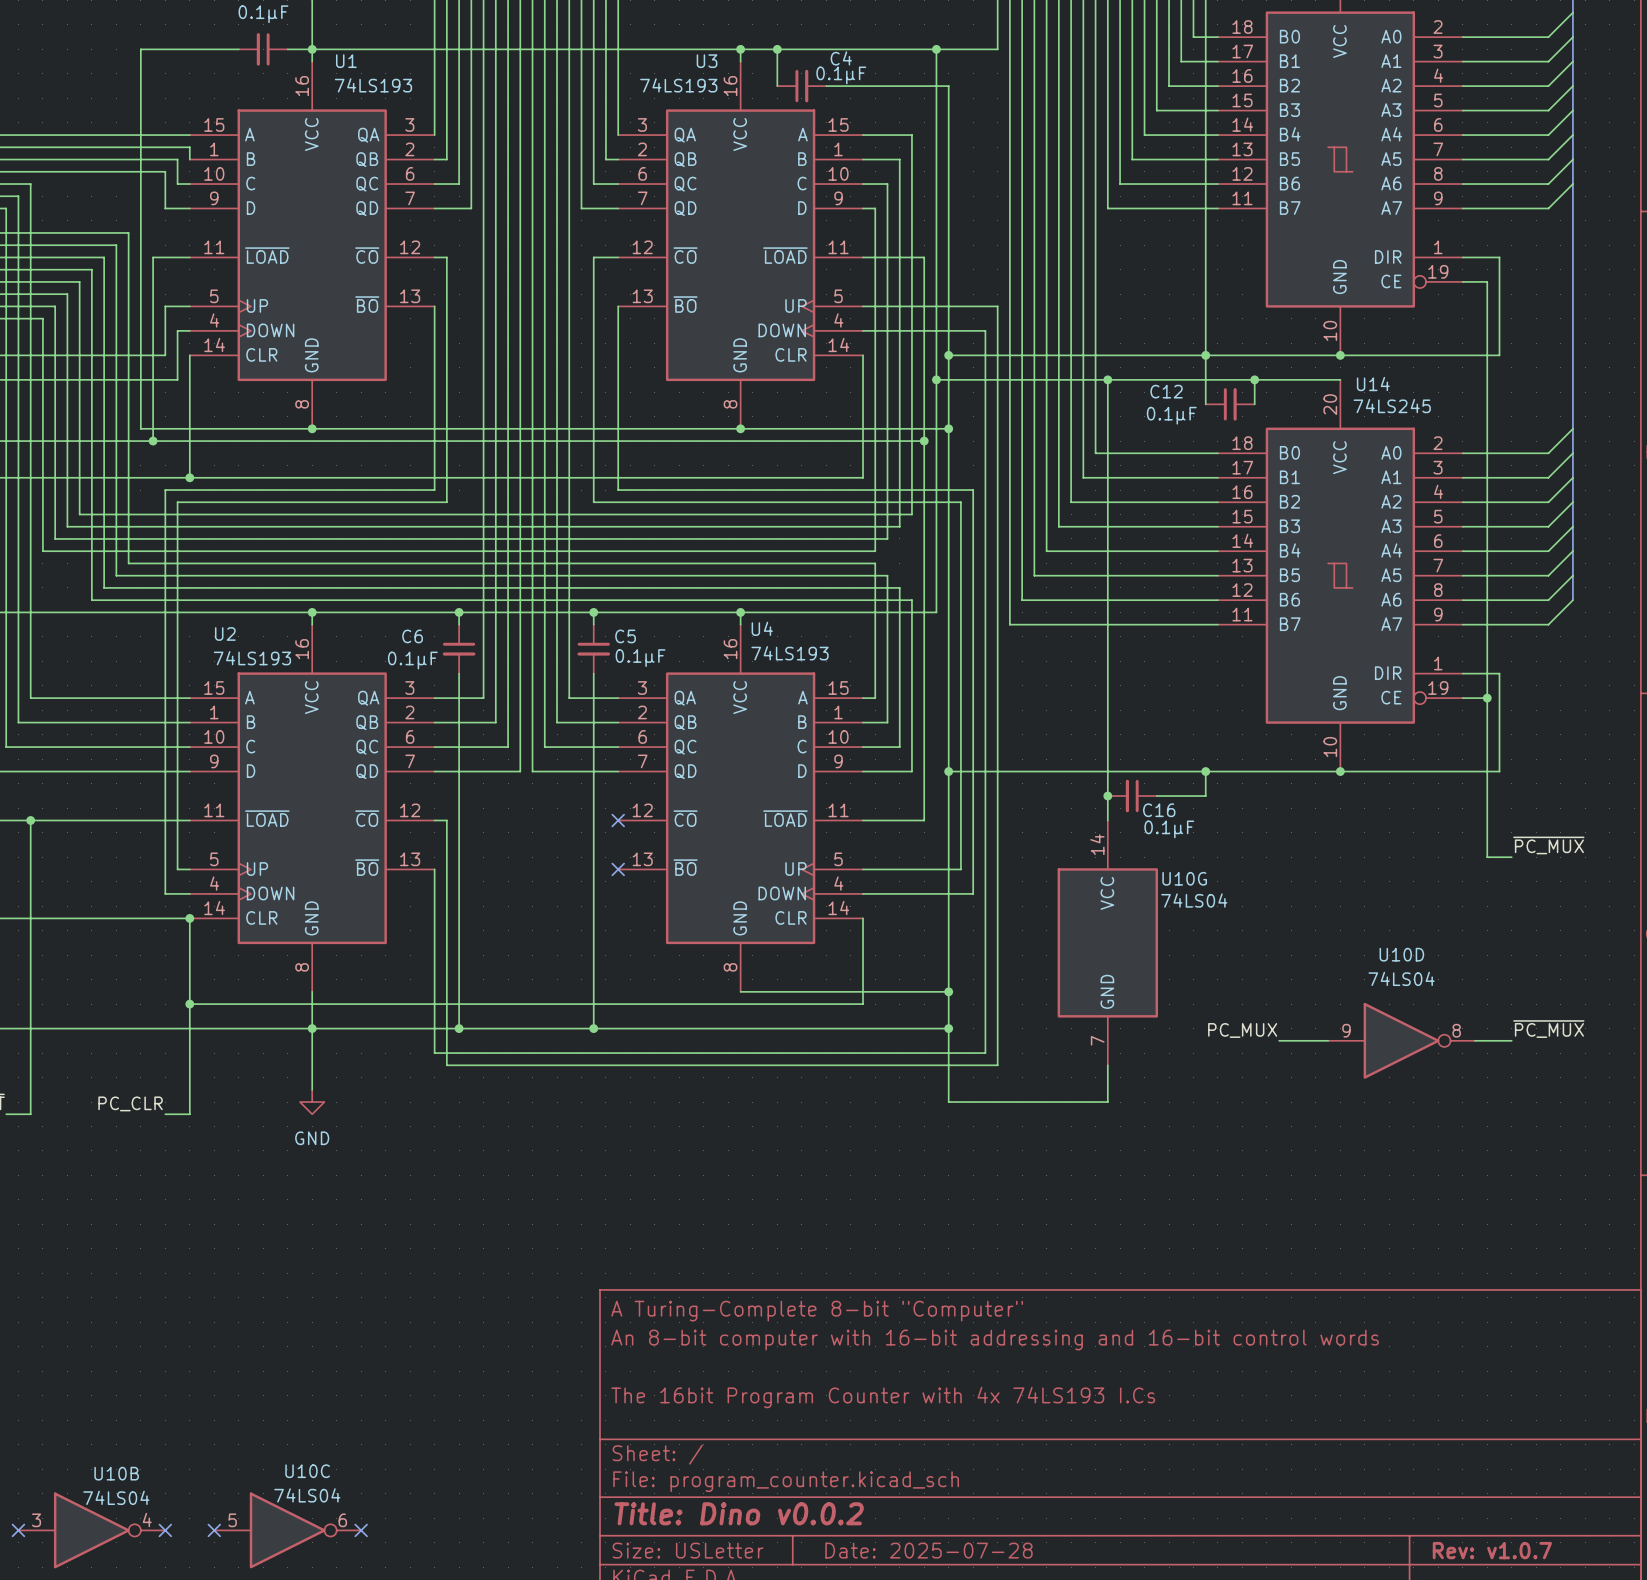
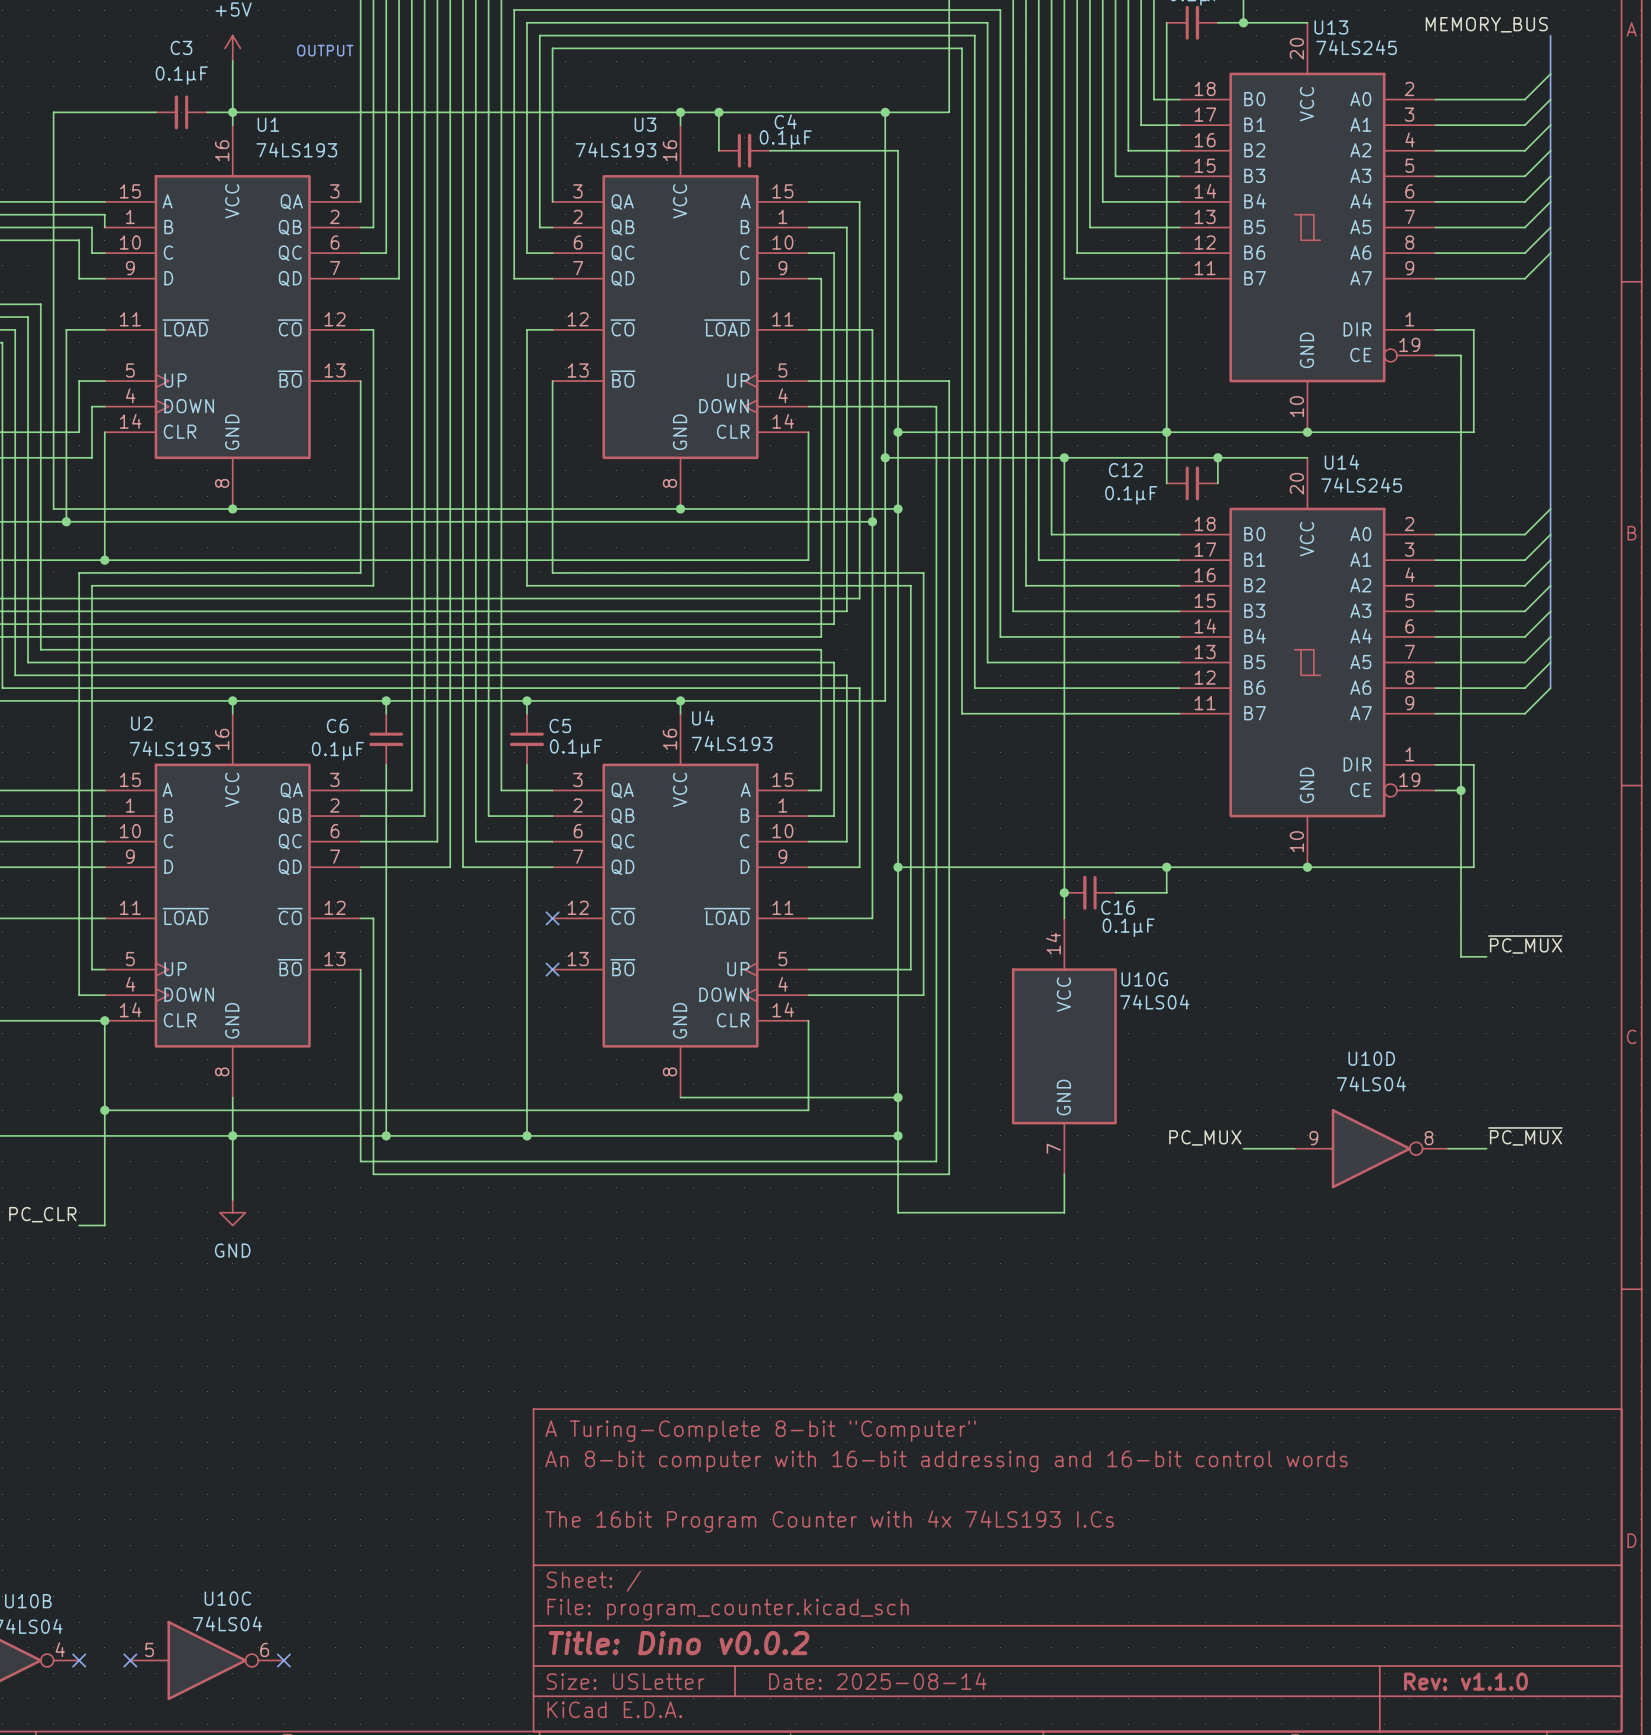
title block: Date: 2025-07-28 (928, 1550) -> Date: 2025-08-14 (877, 1681)
title block: Rev: v1.0.7 (1492, 1550) -> Rev: v1.1.0 (1465, 1681)

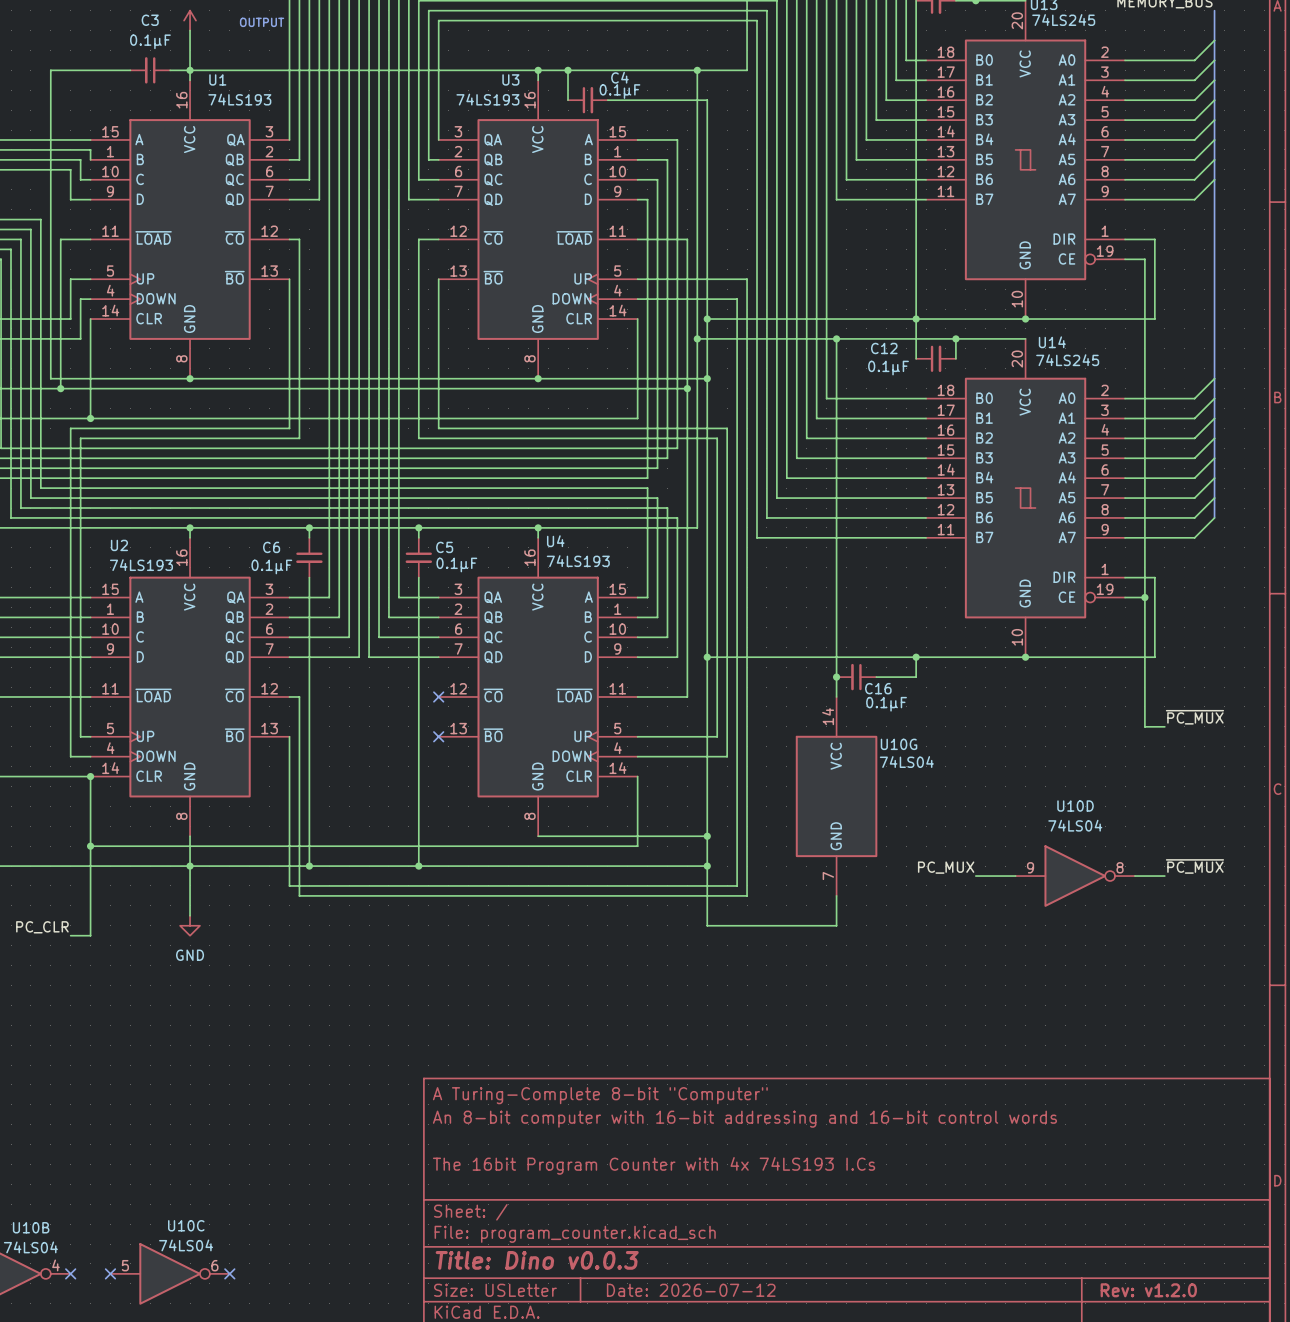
title block: Title: Dino v0.0.2 (679, 1643) -> Title: Dino v0.0.3 (537, 1260)
title block: Date: 2025-08-14 (877, 1681) -> Date: 2026-07-12 (691, 1290)
title block: Rev: v1.1.0 (1465, 1681) -> Rev: v1.2.0 (1148, 1290)

